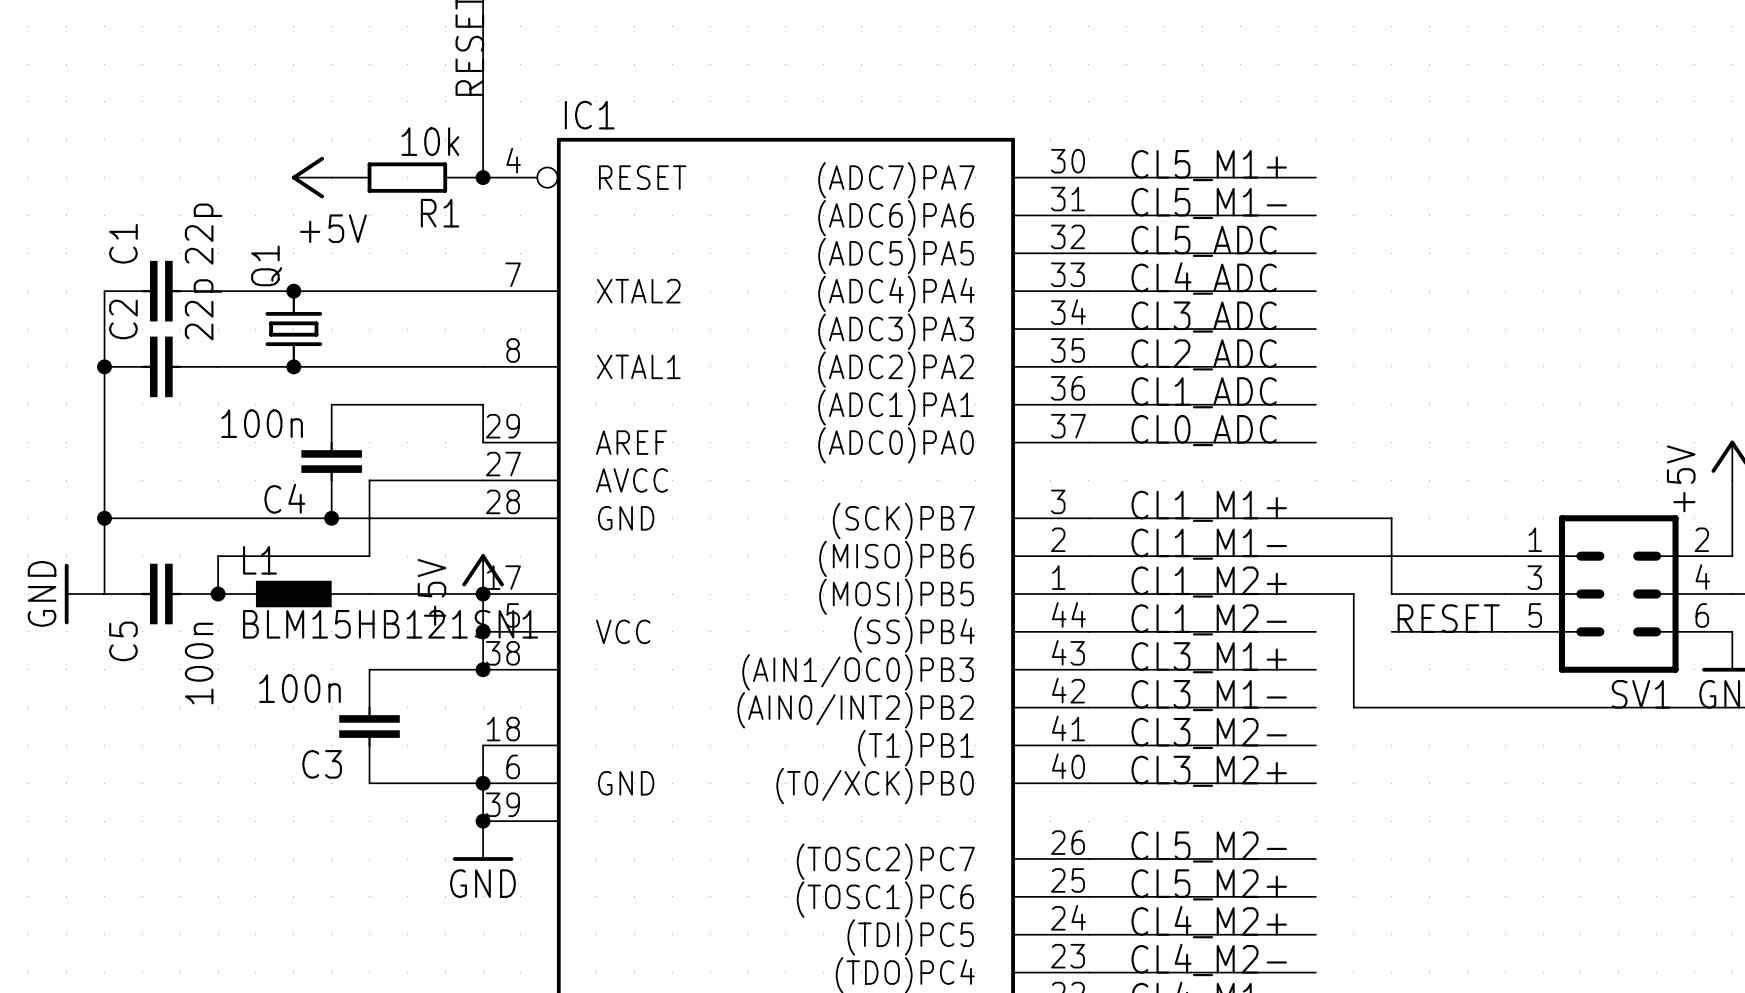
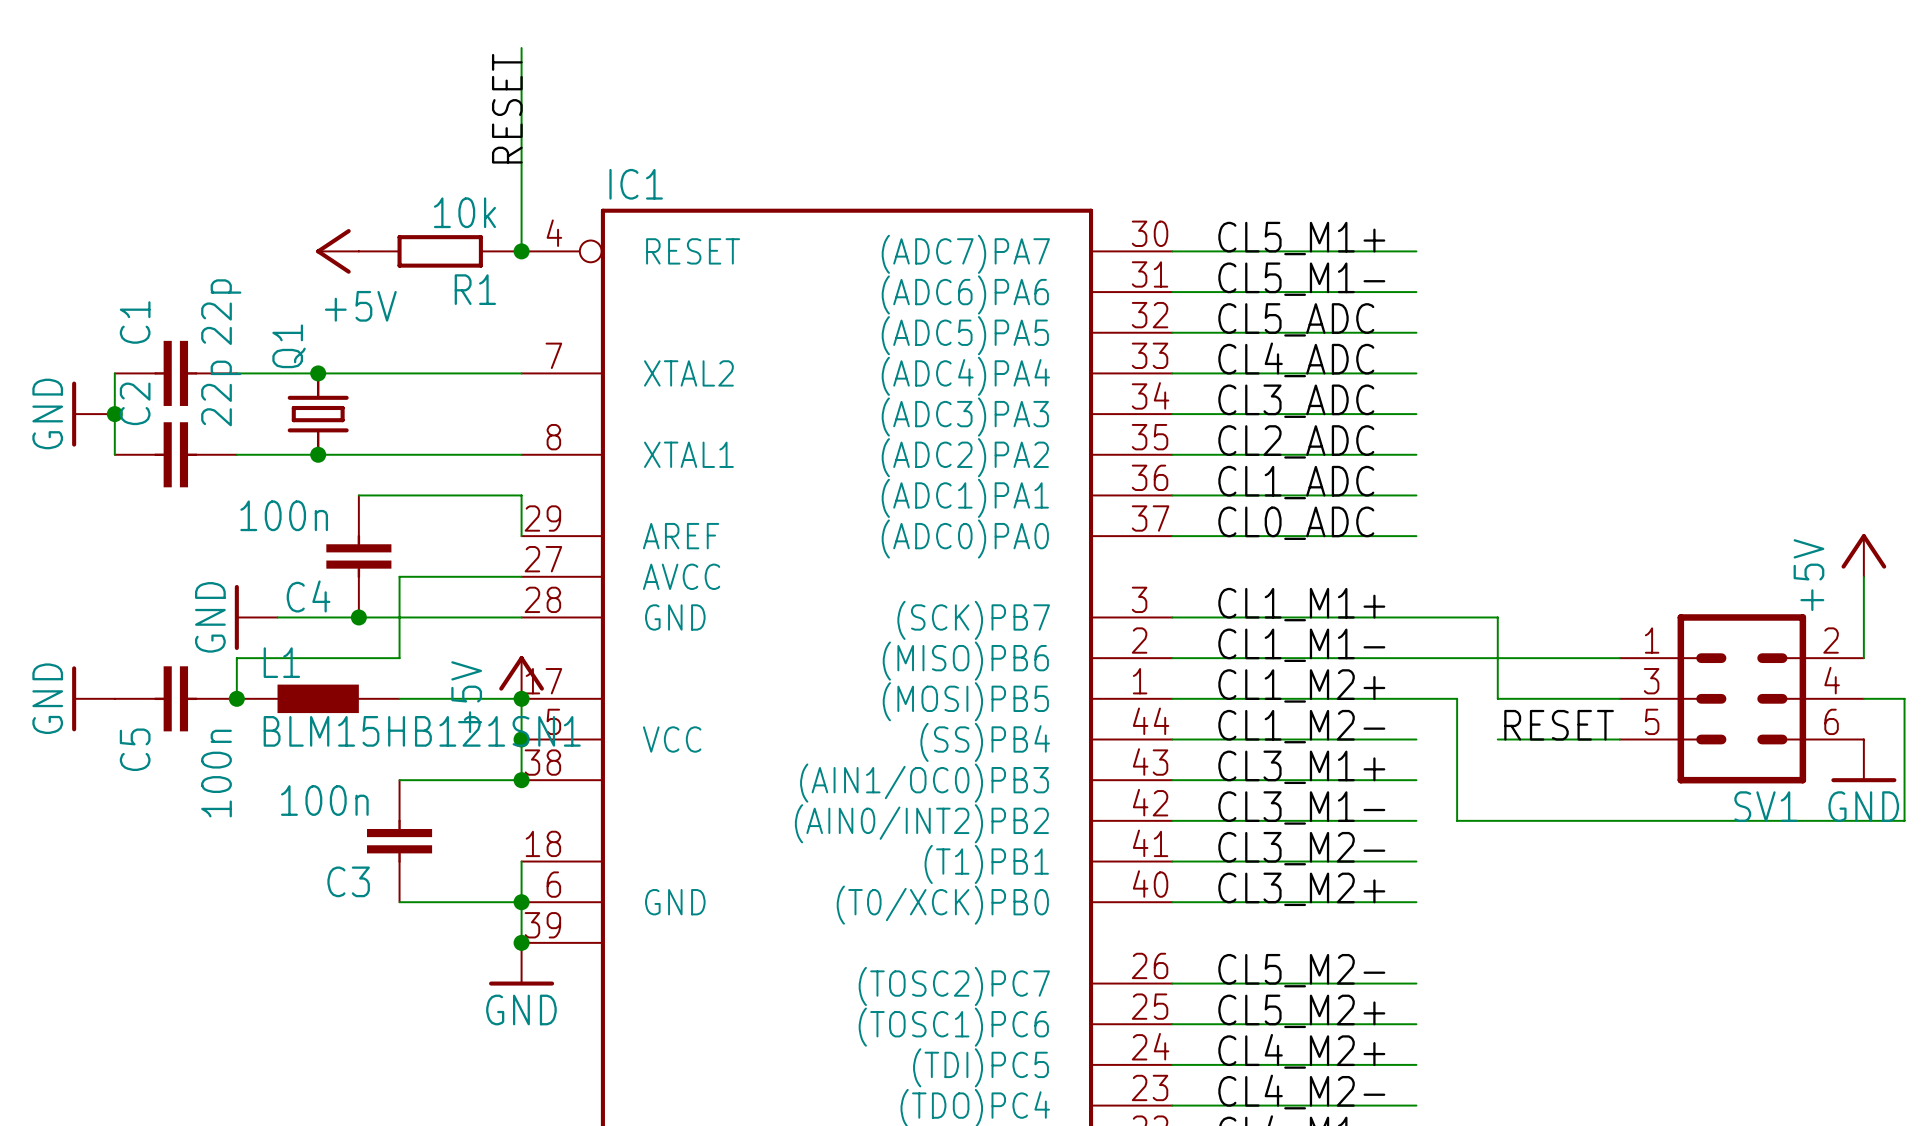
power symbol: none -> GND (93, 414)
wire: (104, 366) (104, 594) -> none
junction position: (104, 366) -> (114, 414)
wire: (104, 518) (255, 518) -> none
junction: (104, 518) -> none
power symbol: none -> GND (256, 617)

